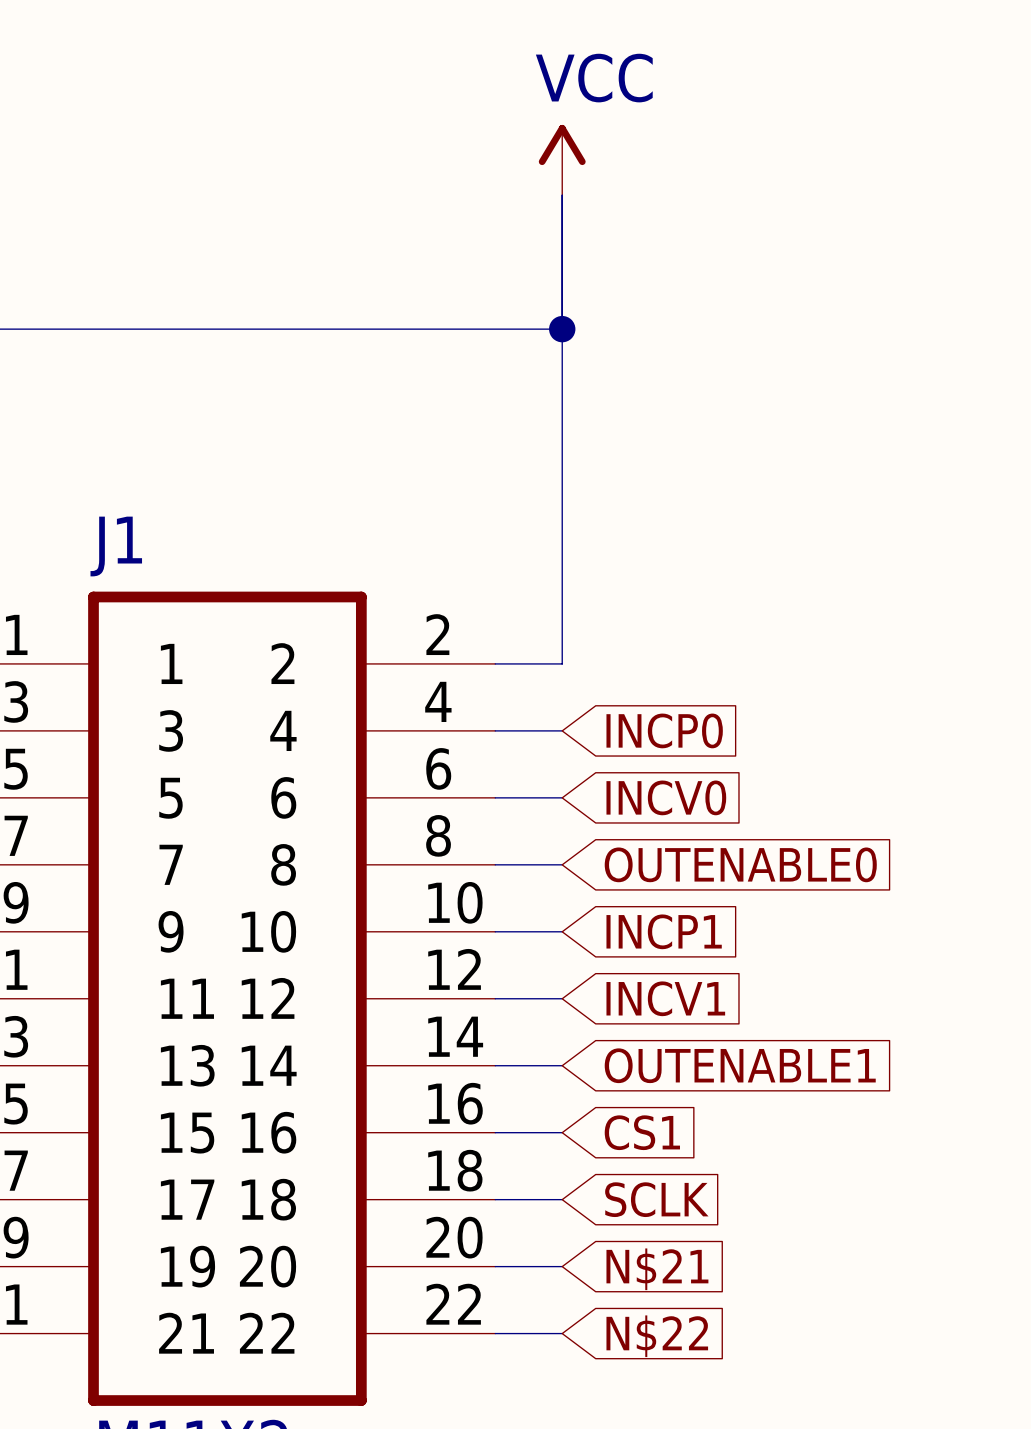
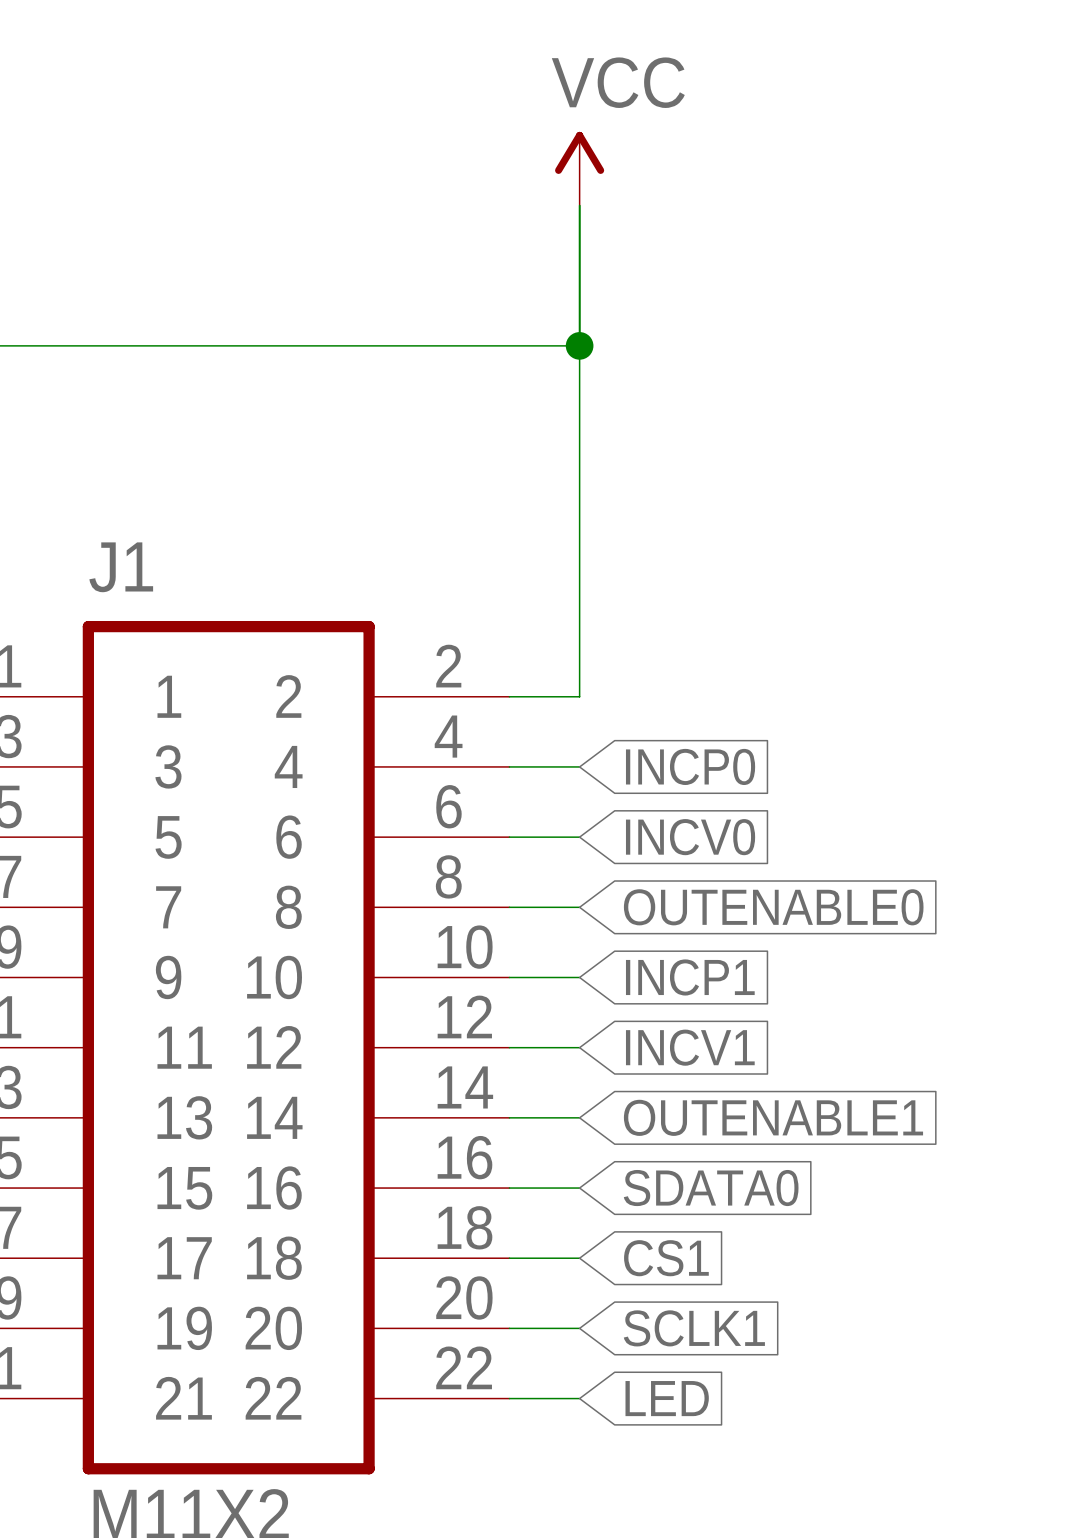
global label: CS1 (642, 1132) -> SDATA0 (711, 1188)
global label: SCLK (656, 1199) -> CS1 (666, 1258)
global label: N$21 (657, 1269) -> SCLK1 (694, 1328)
global label: N$22 (657, 1336) -> LED (667, 1398)

